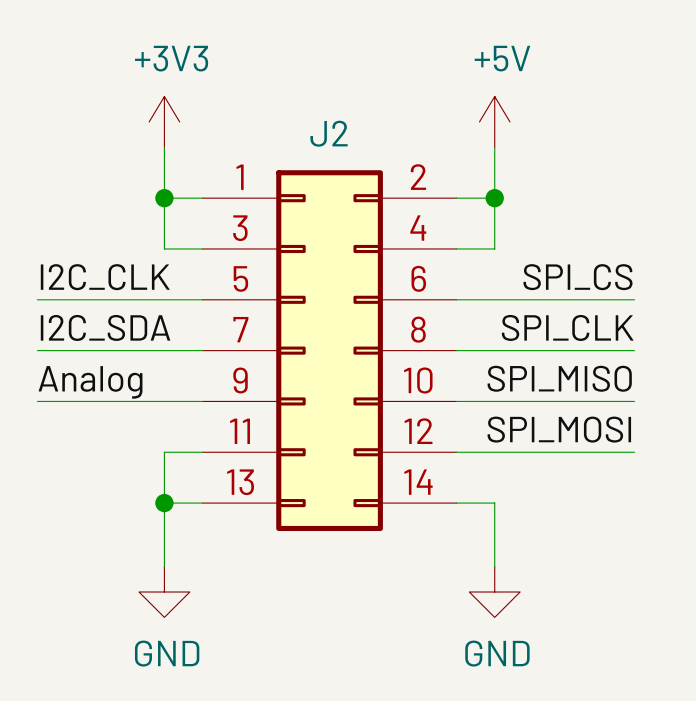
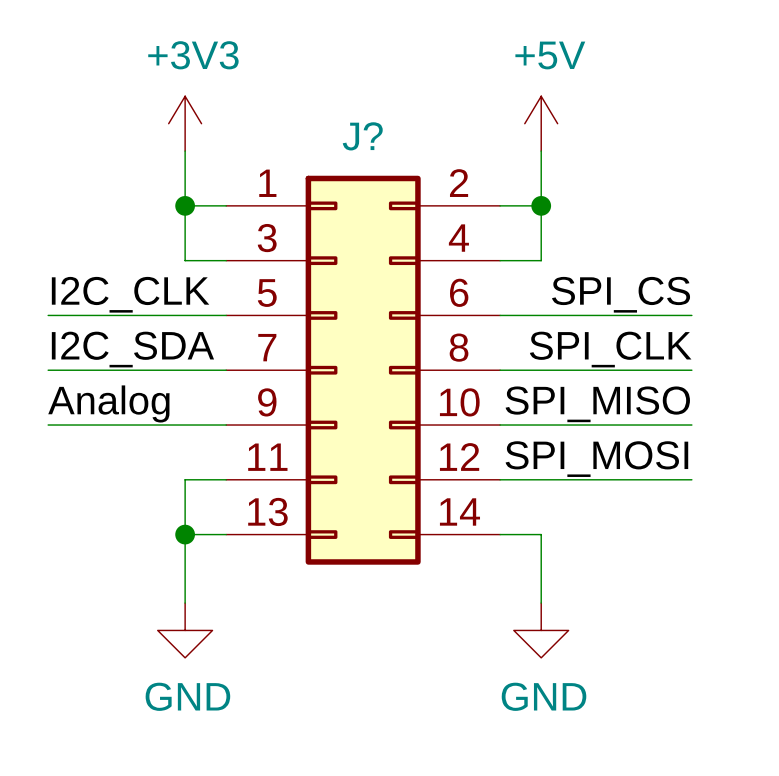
J2 name: J2 (329, 133) -> J? (362, 136)

